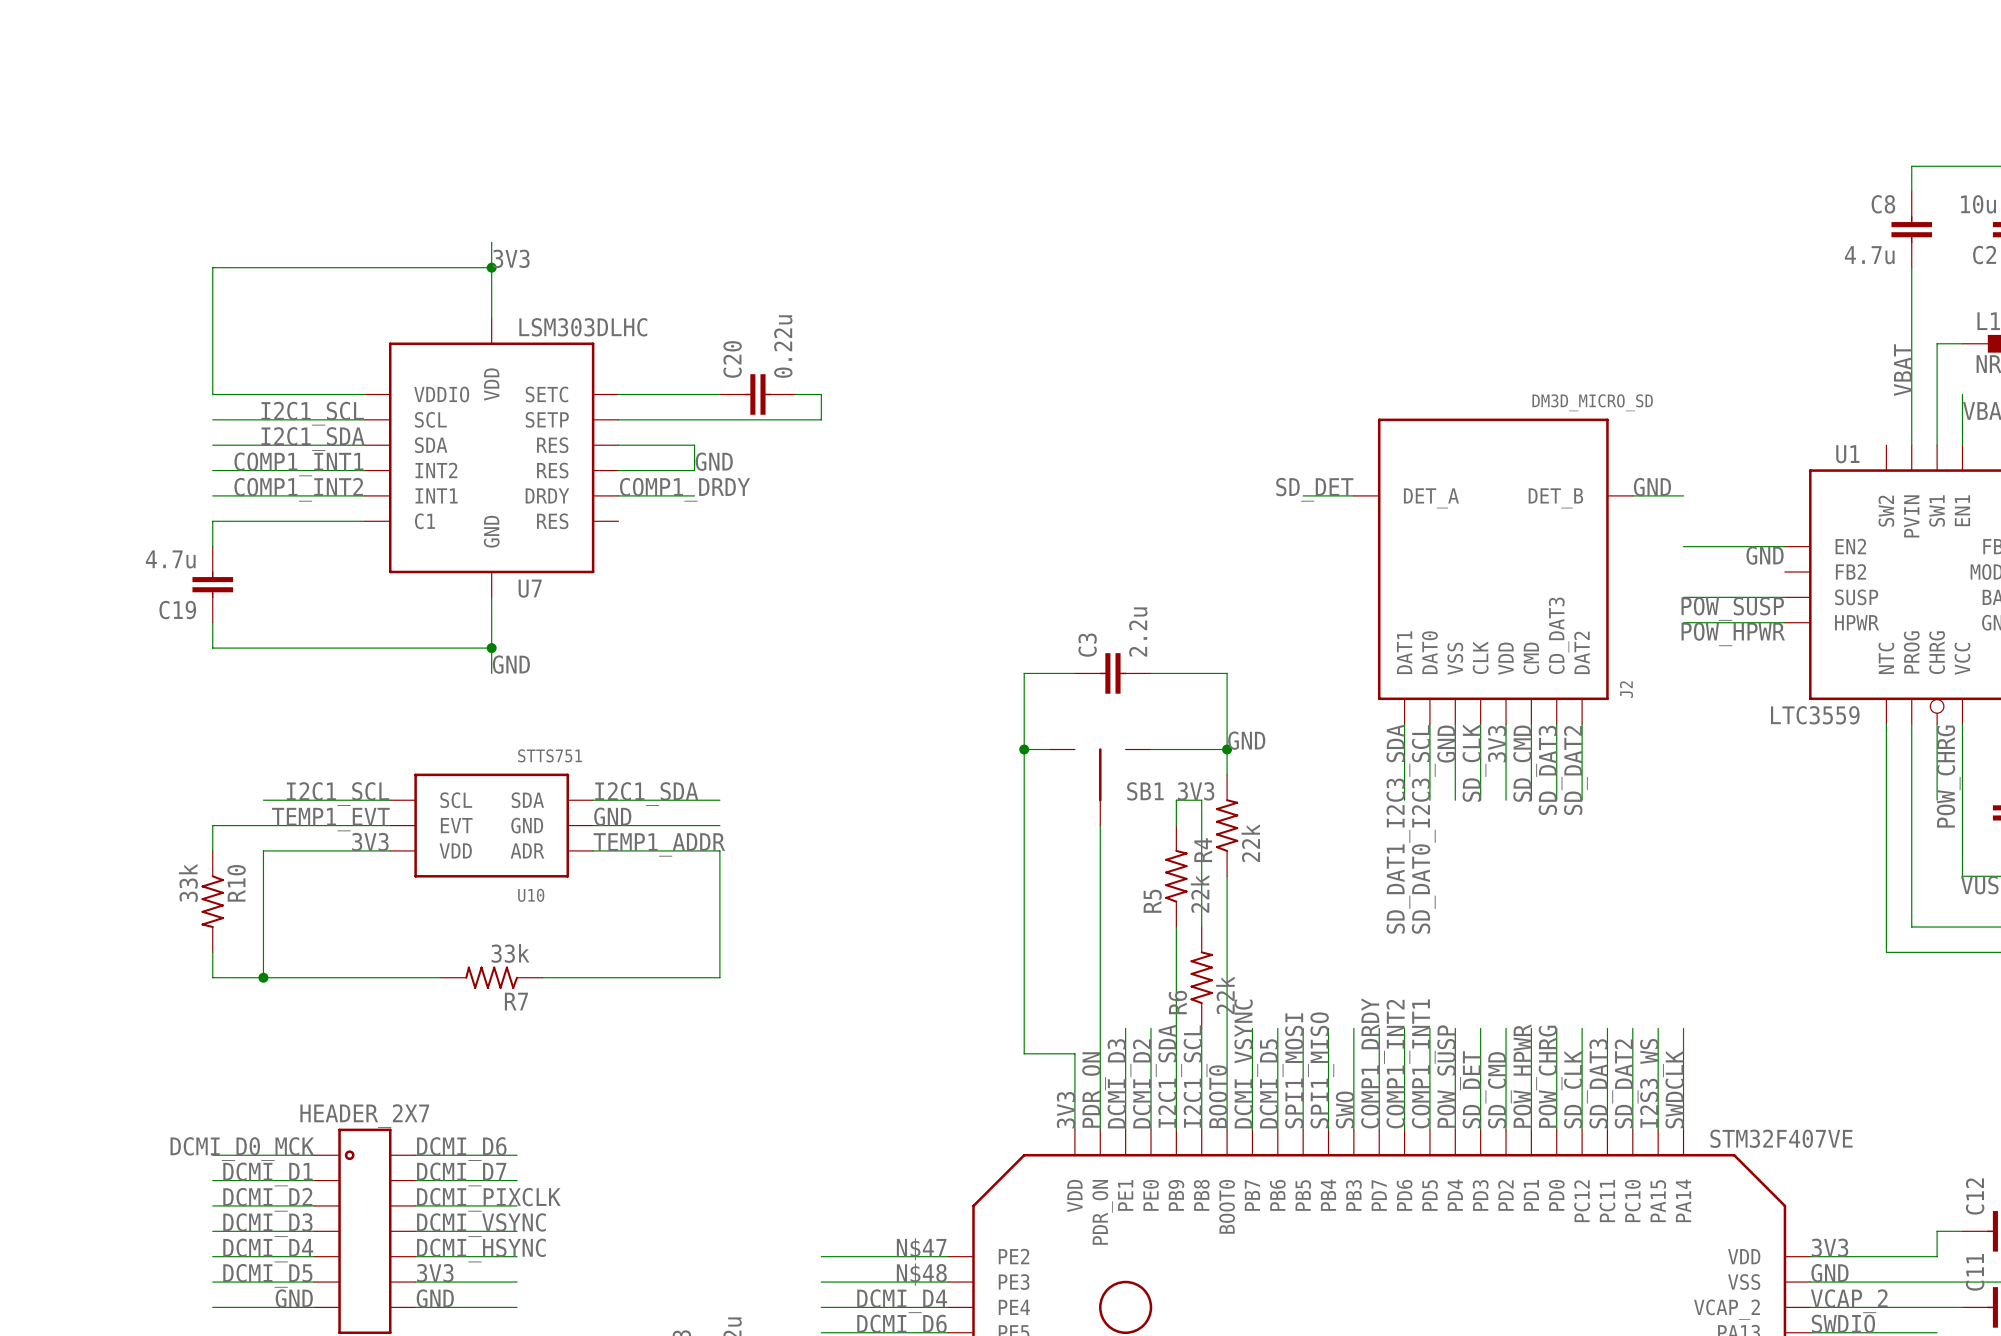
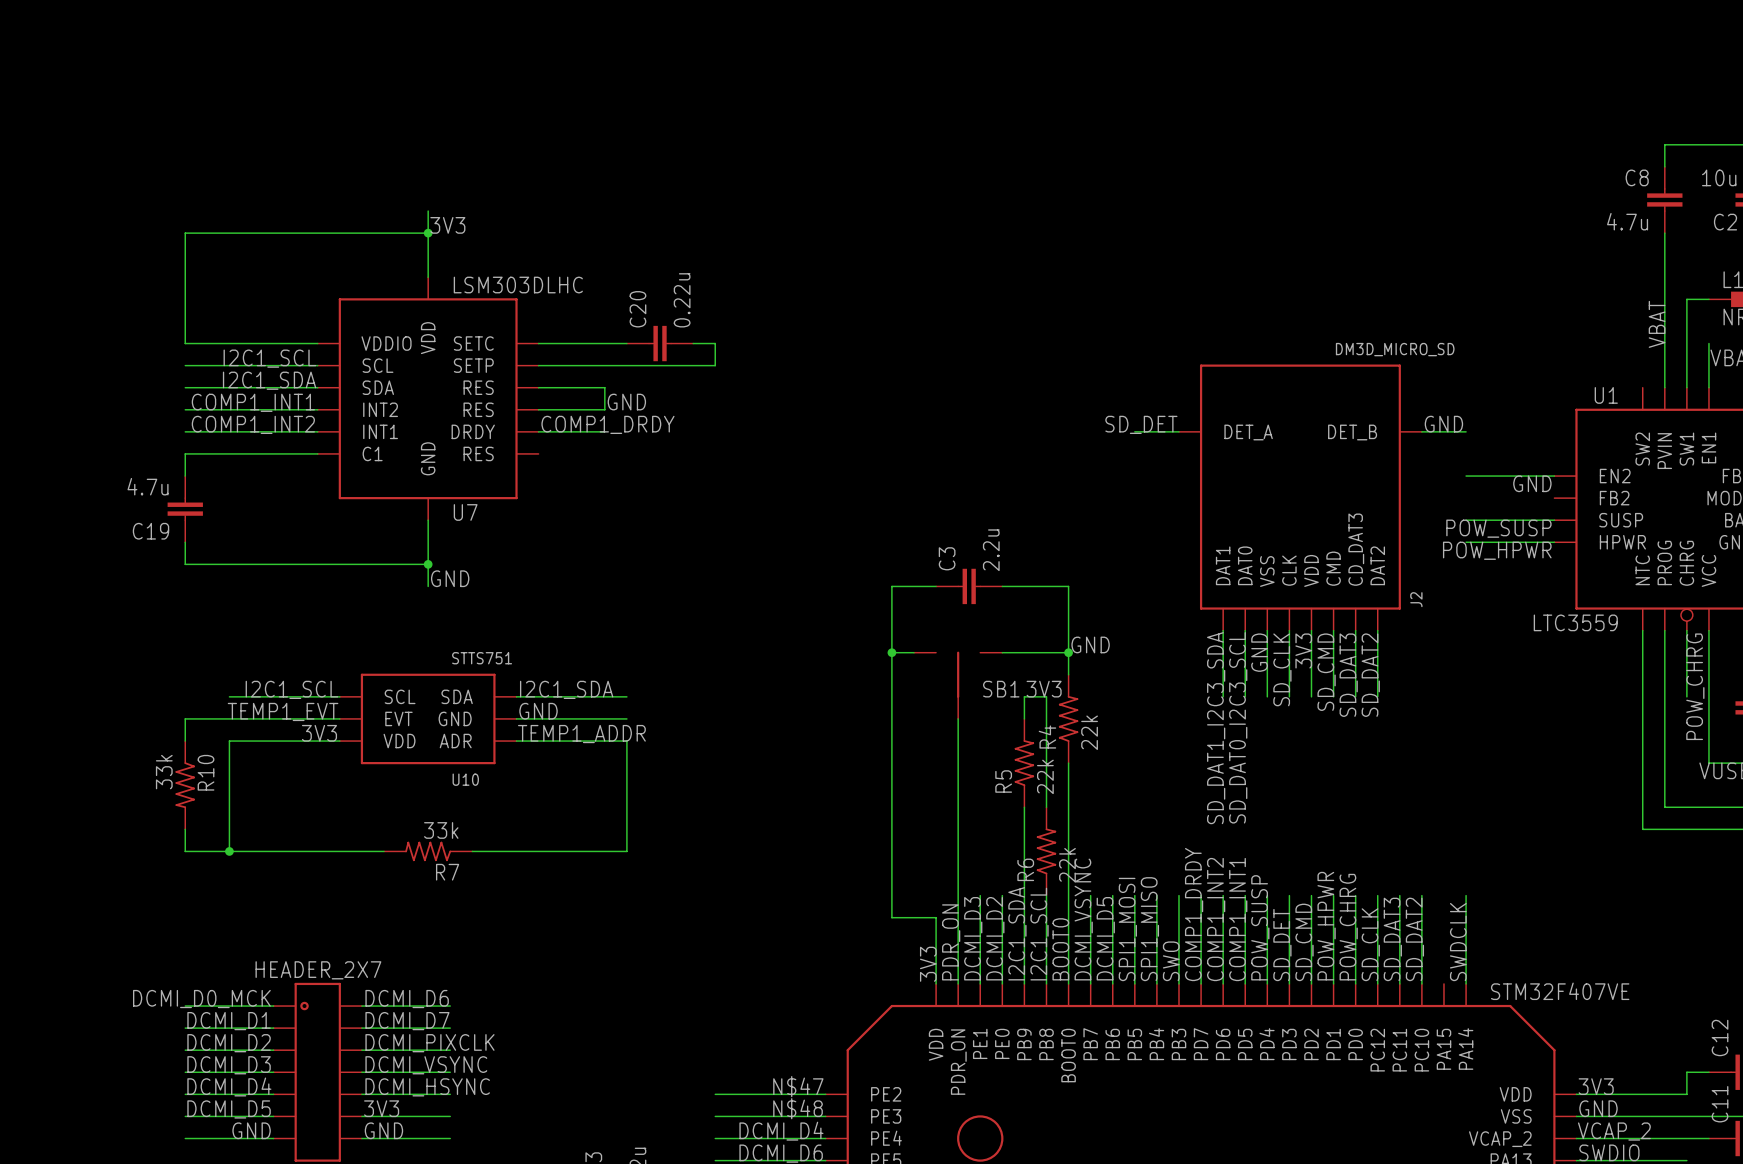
wire: (1658, 1028) (1658, 1129) -> none
label: I2S3_WS (1651, 1083) -> none

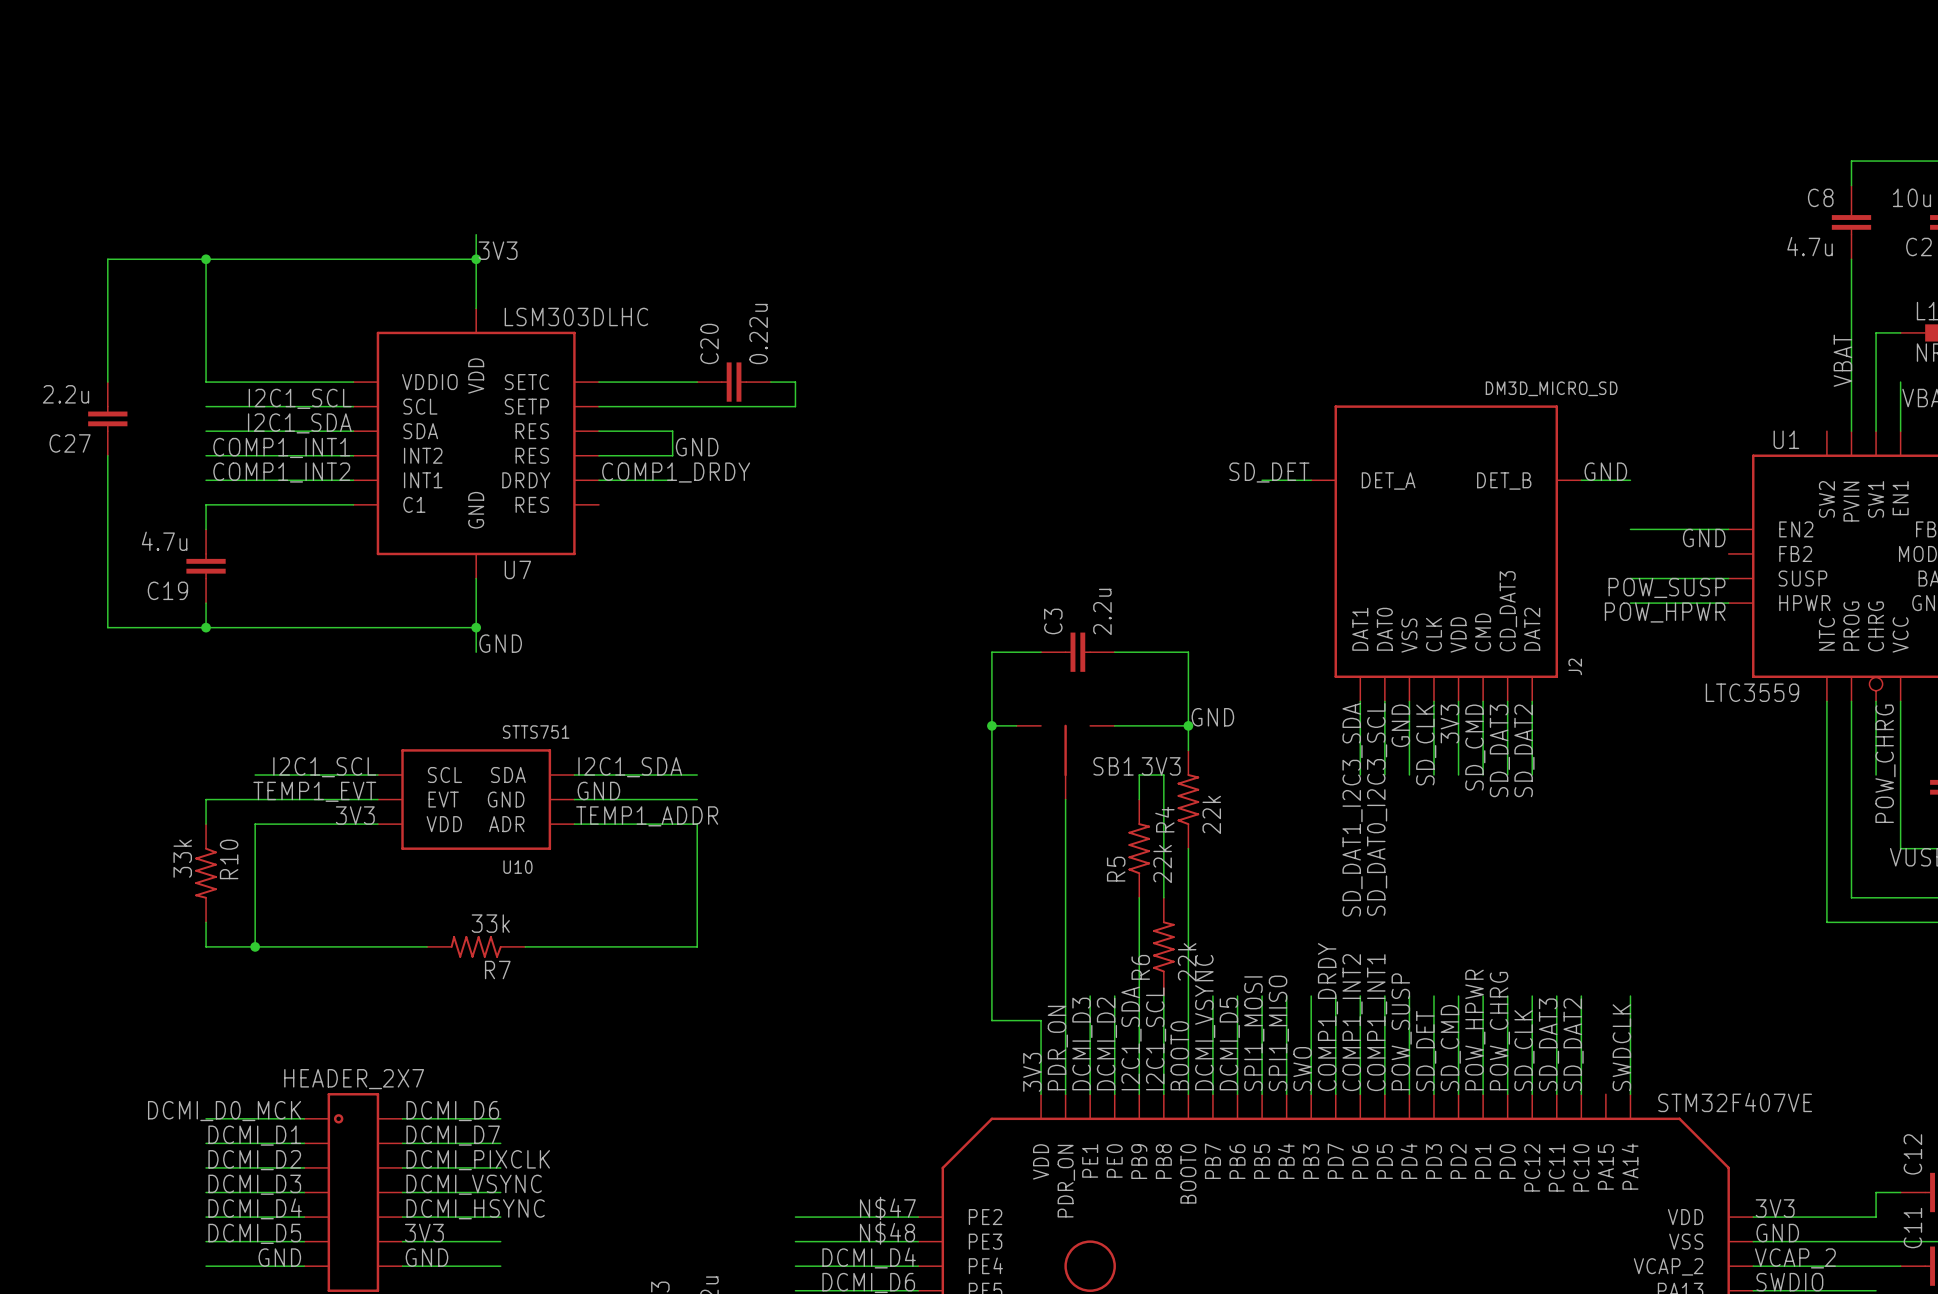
wire: none -> (206, 259) (107, 259) (107, 382)
junction: none -> (206, 259)
C27: none -> 2.2u (107, 418)
wire: none -> (107, 455) (107, 627) (206, 627)
junction: none -> (206, 627)

